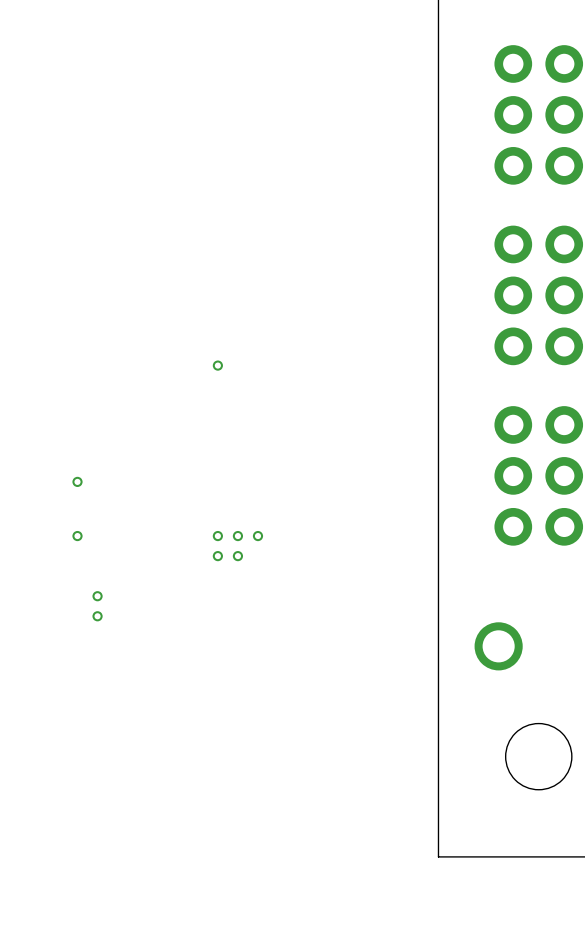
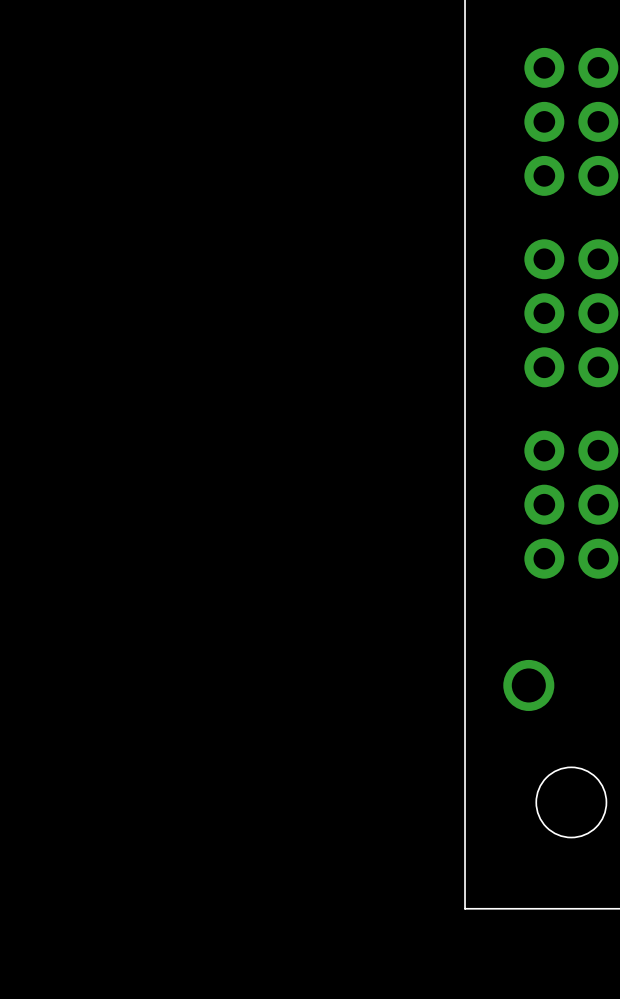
via: (217, 365) -> none
via: (77, 481) -> none
via: (77, 536) -> none
via: (217, 536) -> none
via: (237, 536) -> none
via: (257, 536) -> none
via: (217, 556) -> none
via: (237, 556) -> none
via: (97, 596) -> none
via: (97, 616) -> none

